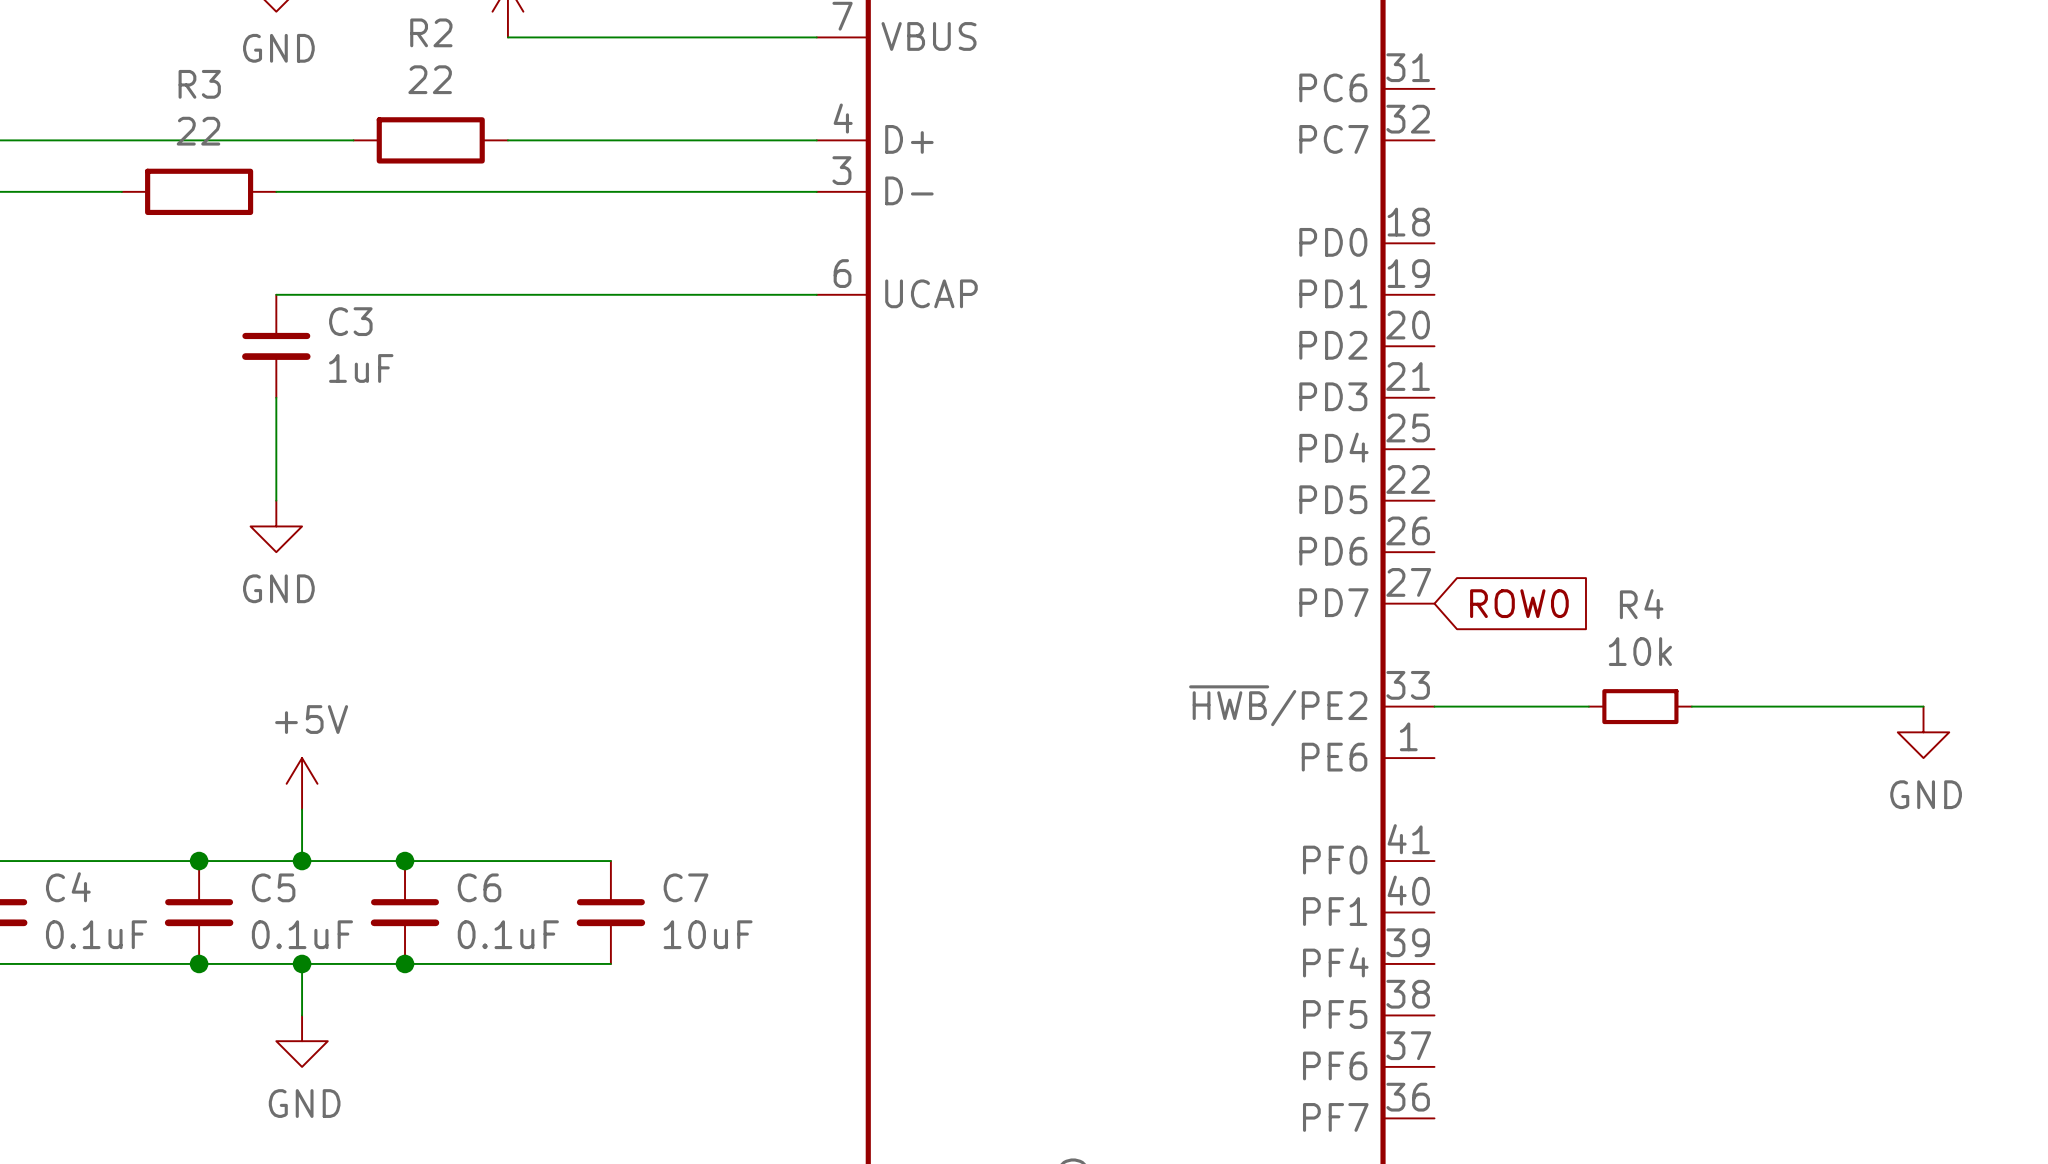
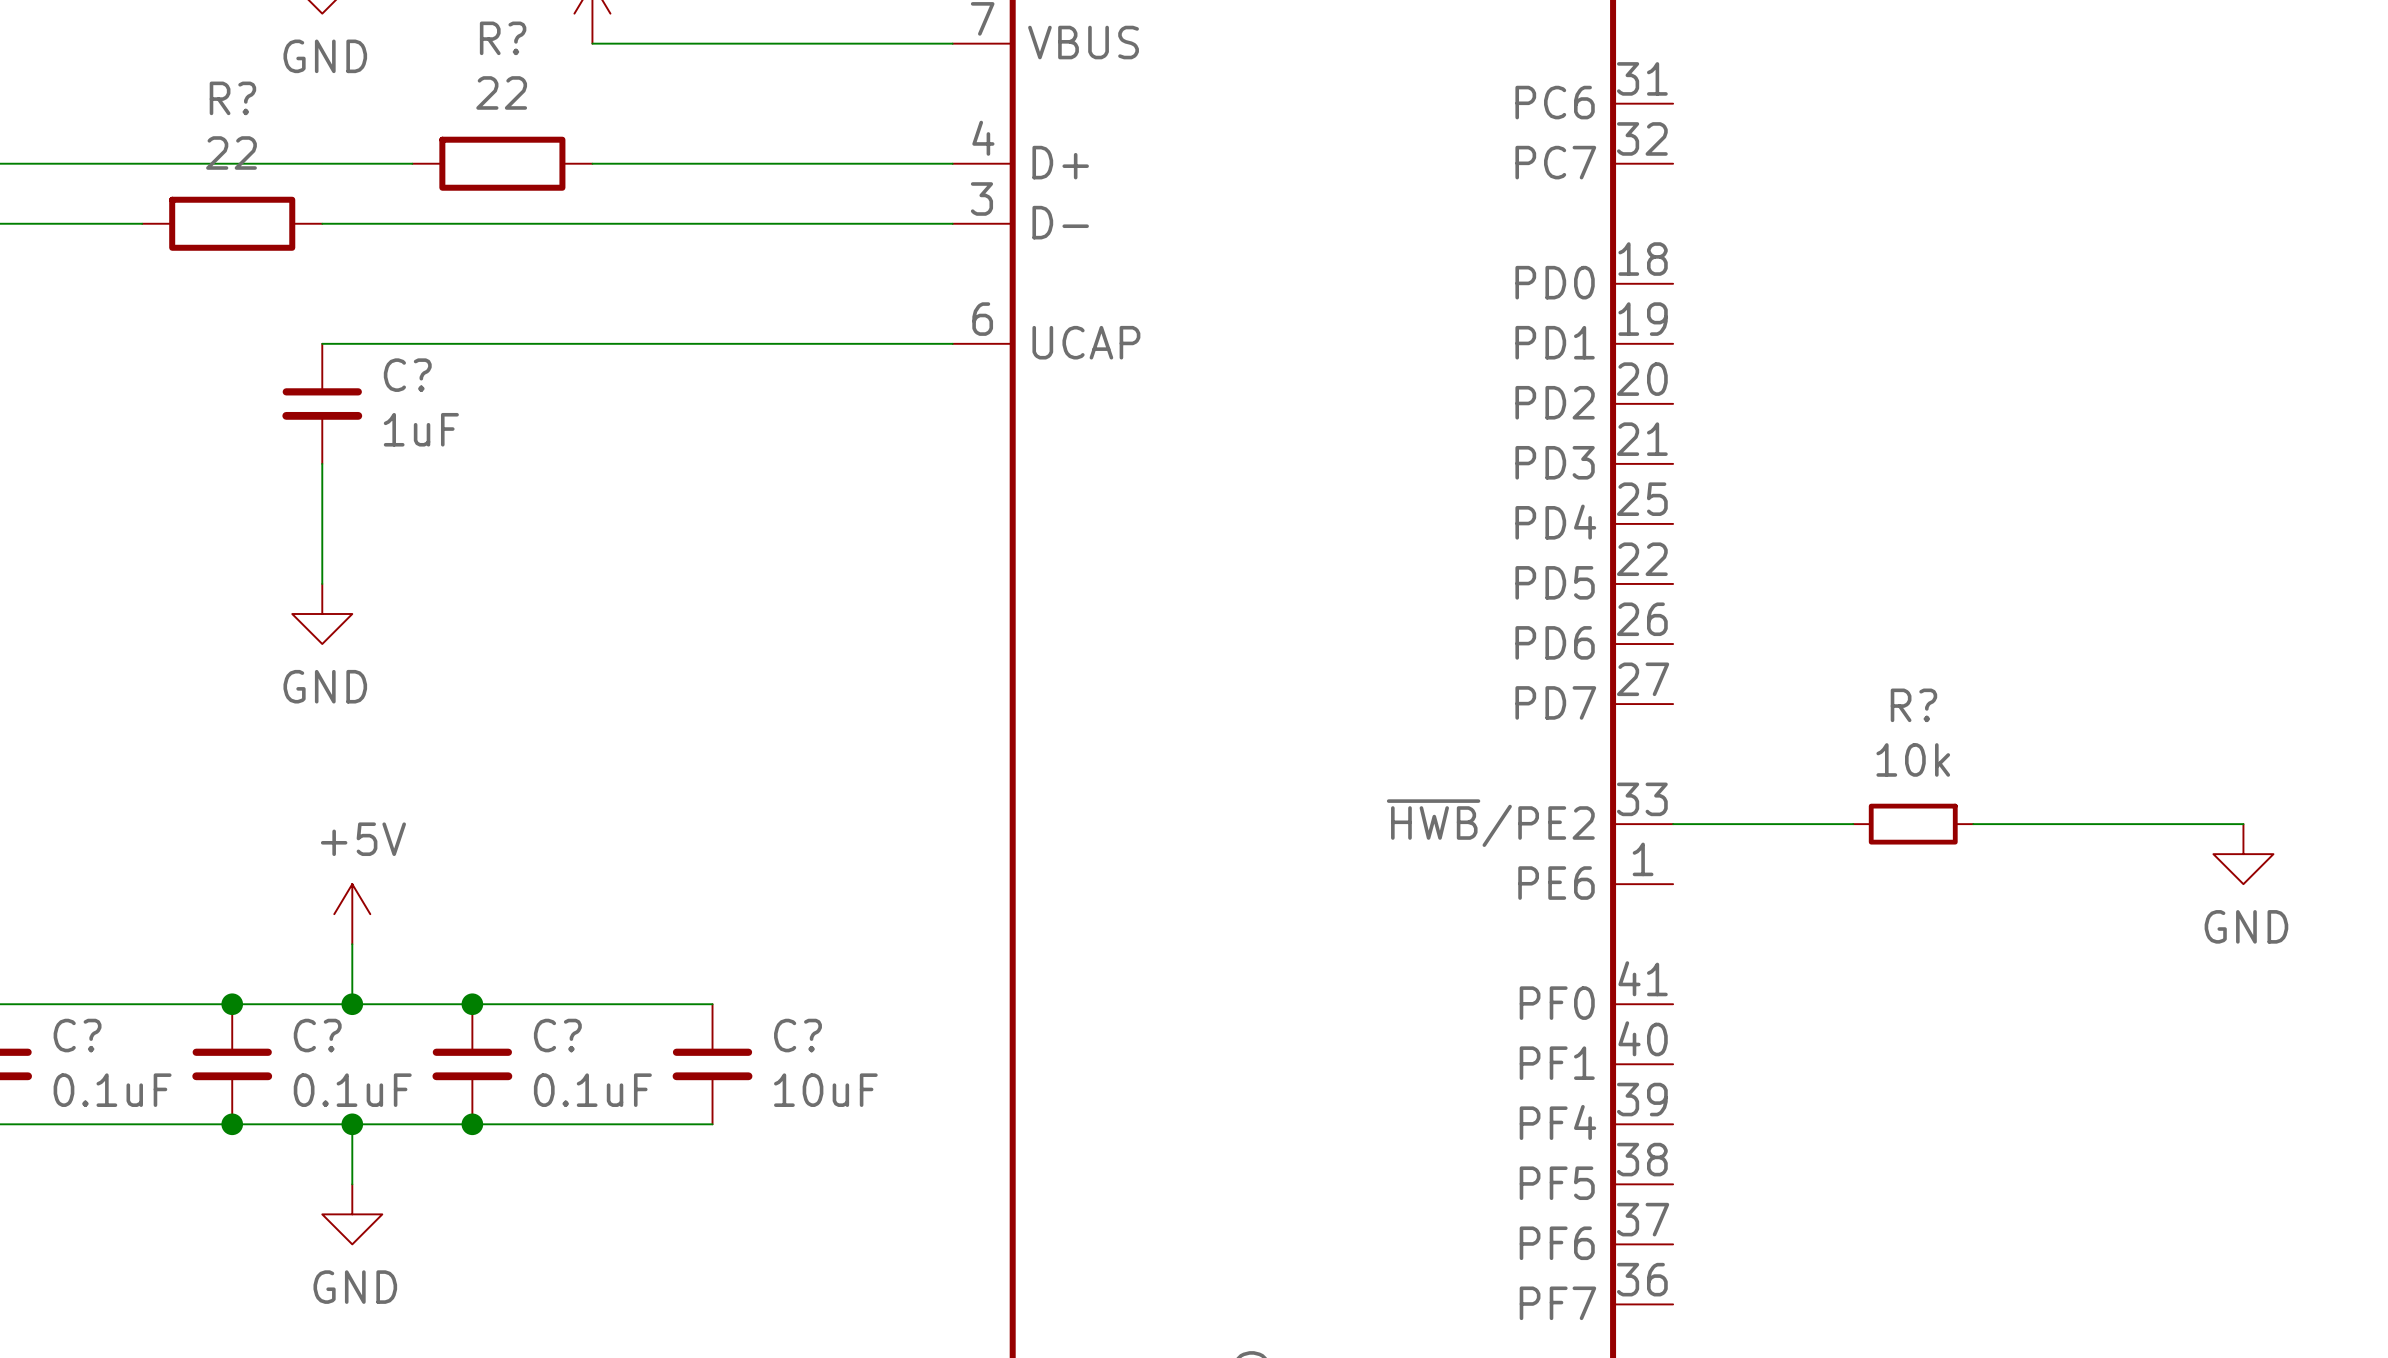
R2 name: R2 (431, 32) -> R? (503, 38)
R3 name: R3 (199, 84) -> R? (232, 98)
C3 name: C3 (350, 321) -> C? (407, 375)
global label: ROW0 (1519, 603) -> none
R4 name: R4 (1641, 604) -> R? (1913, 705)
C4 name: C4 (68, 887) -> C? (77, 1035)
C5 name: C5 (273, 887) -> C? (317, 1035)
C6 name: C6 (479, 887) -> C? (557, 1035)
C7 name: C7 (686, 887) -> C? (797, 1035)

